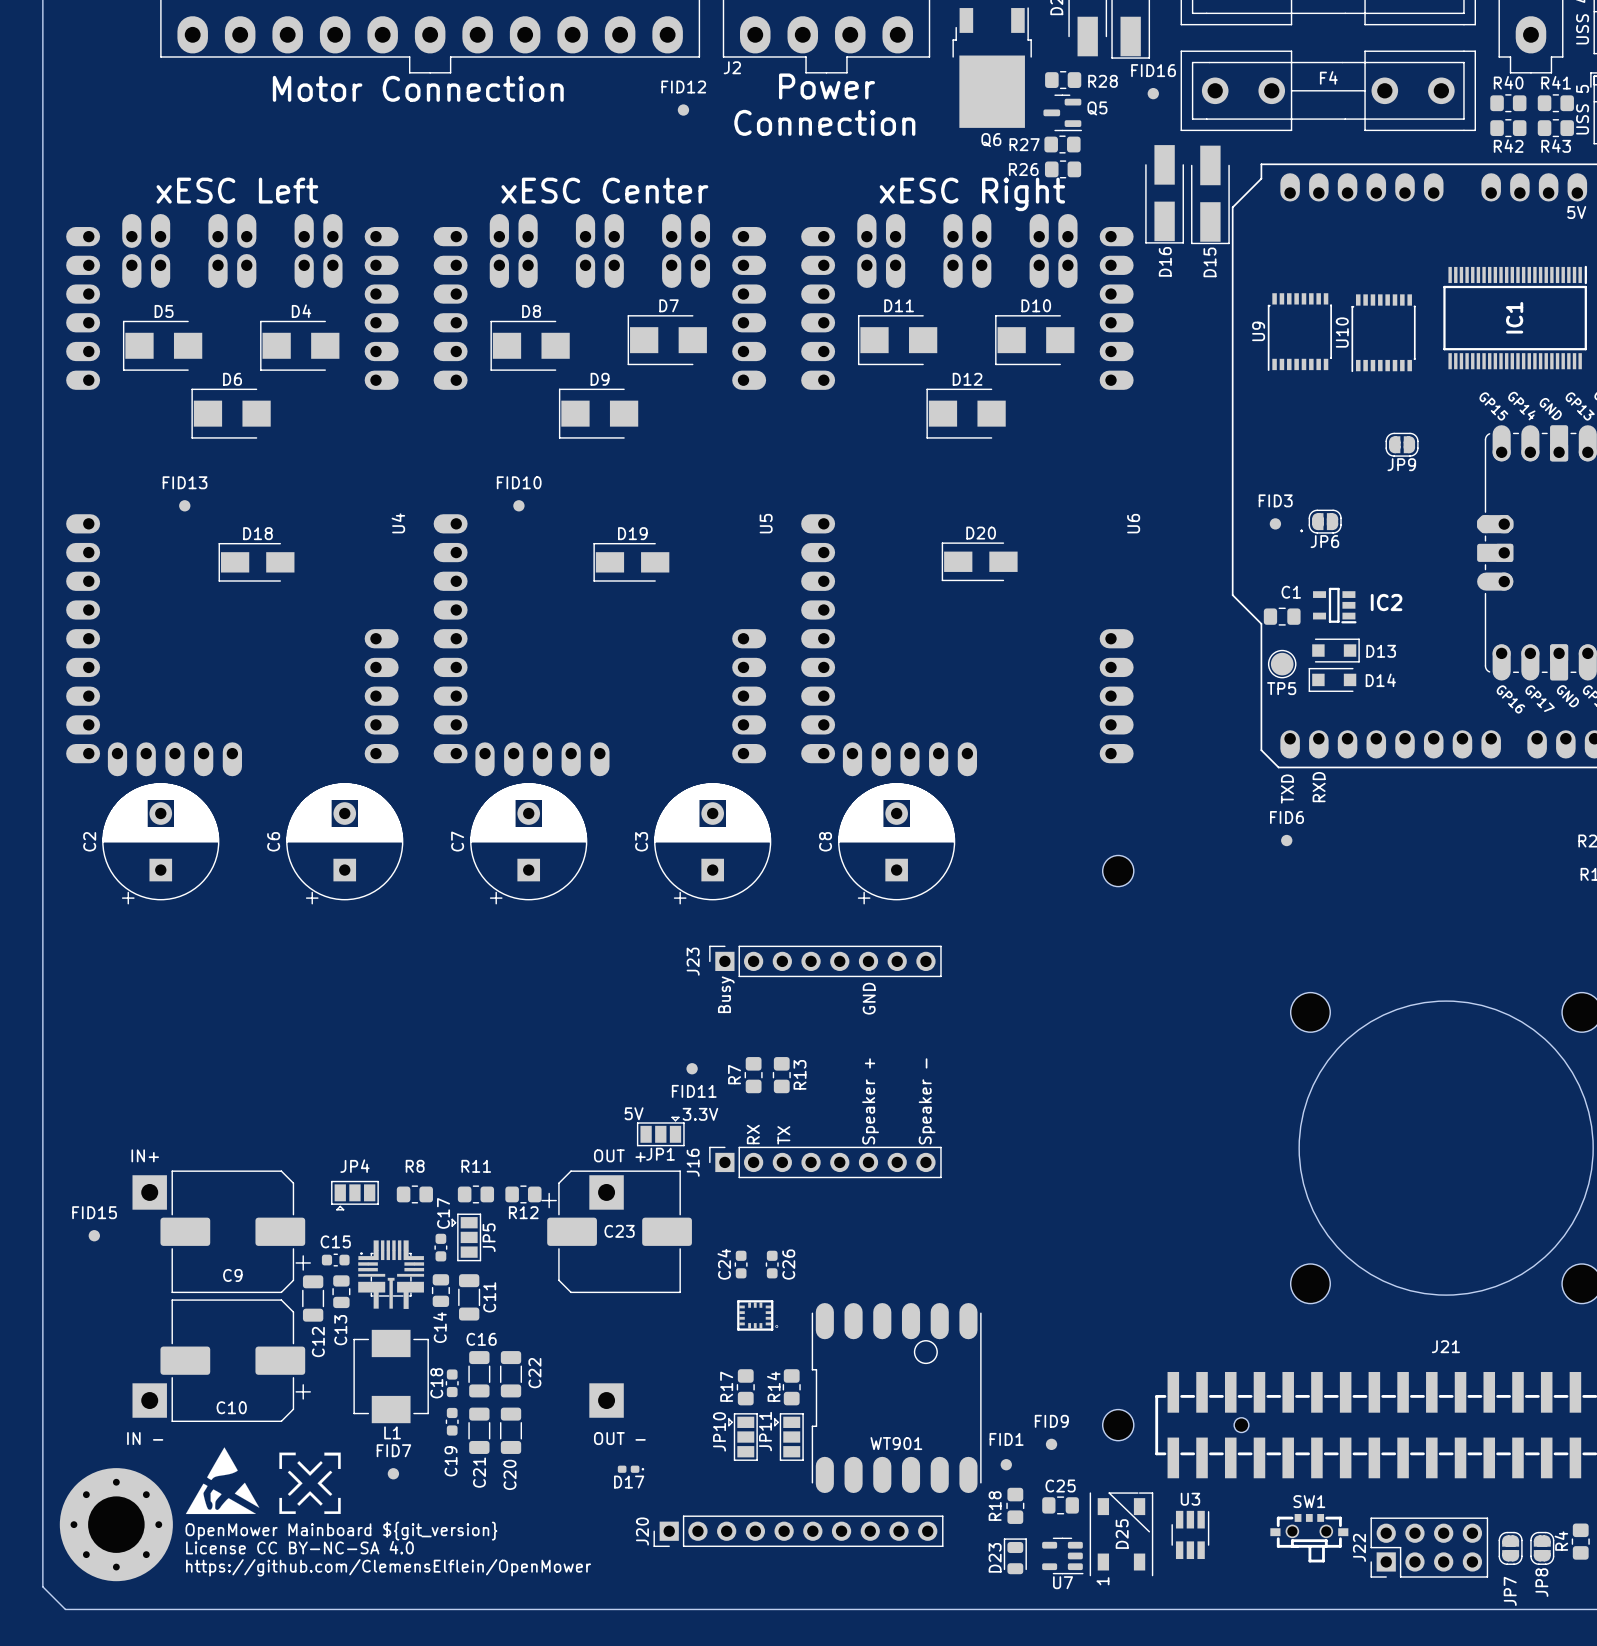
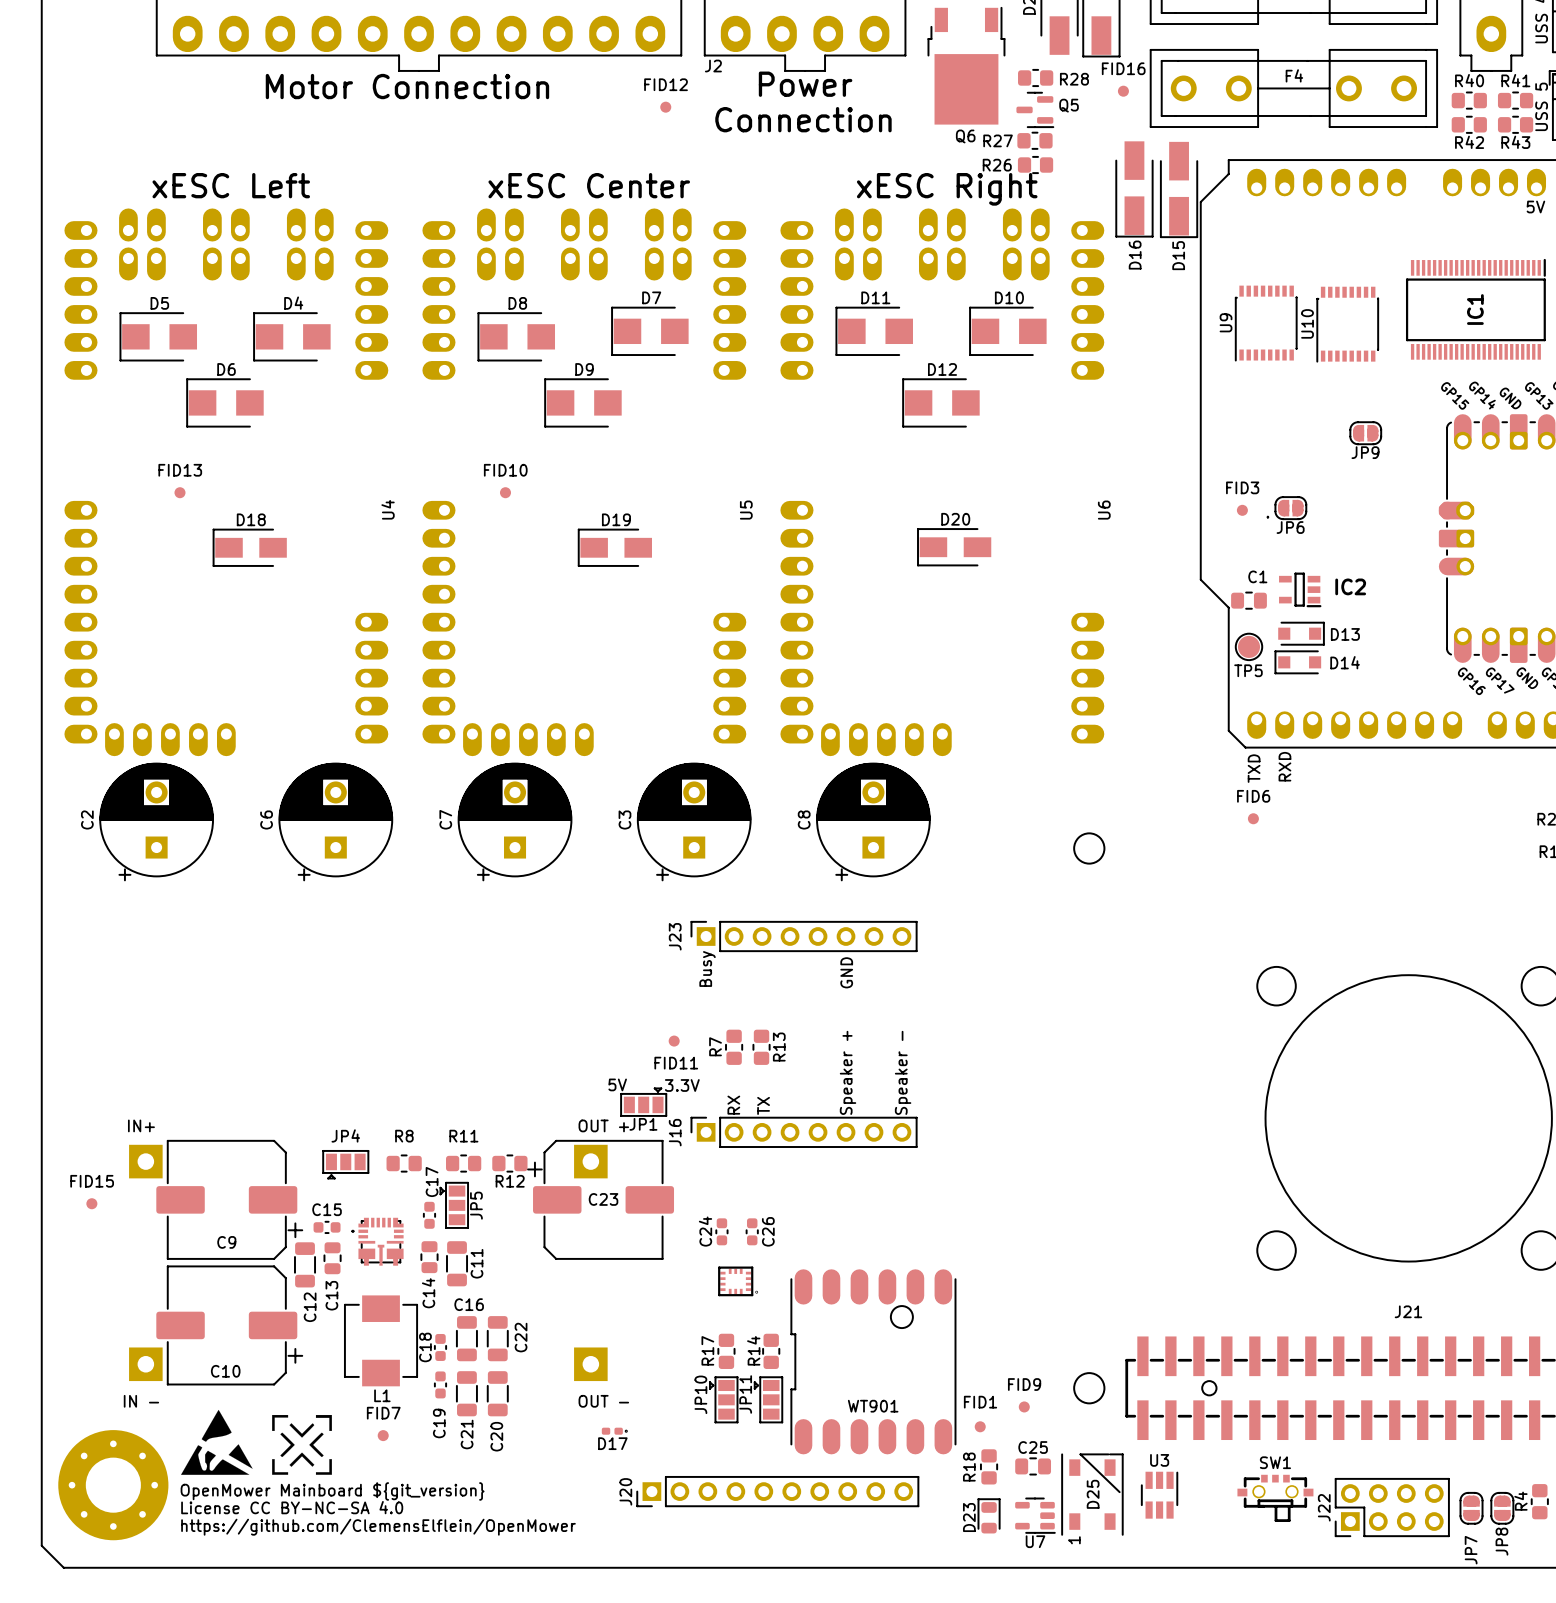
part footprint: [358, 1240, 425, 1309] -> [351, 1217, 404, 1266]

